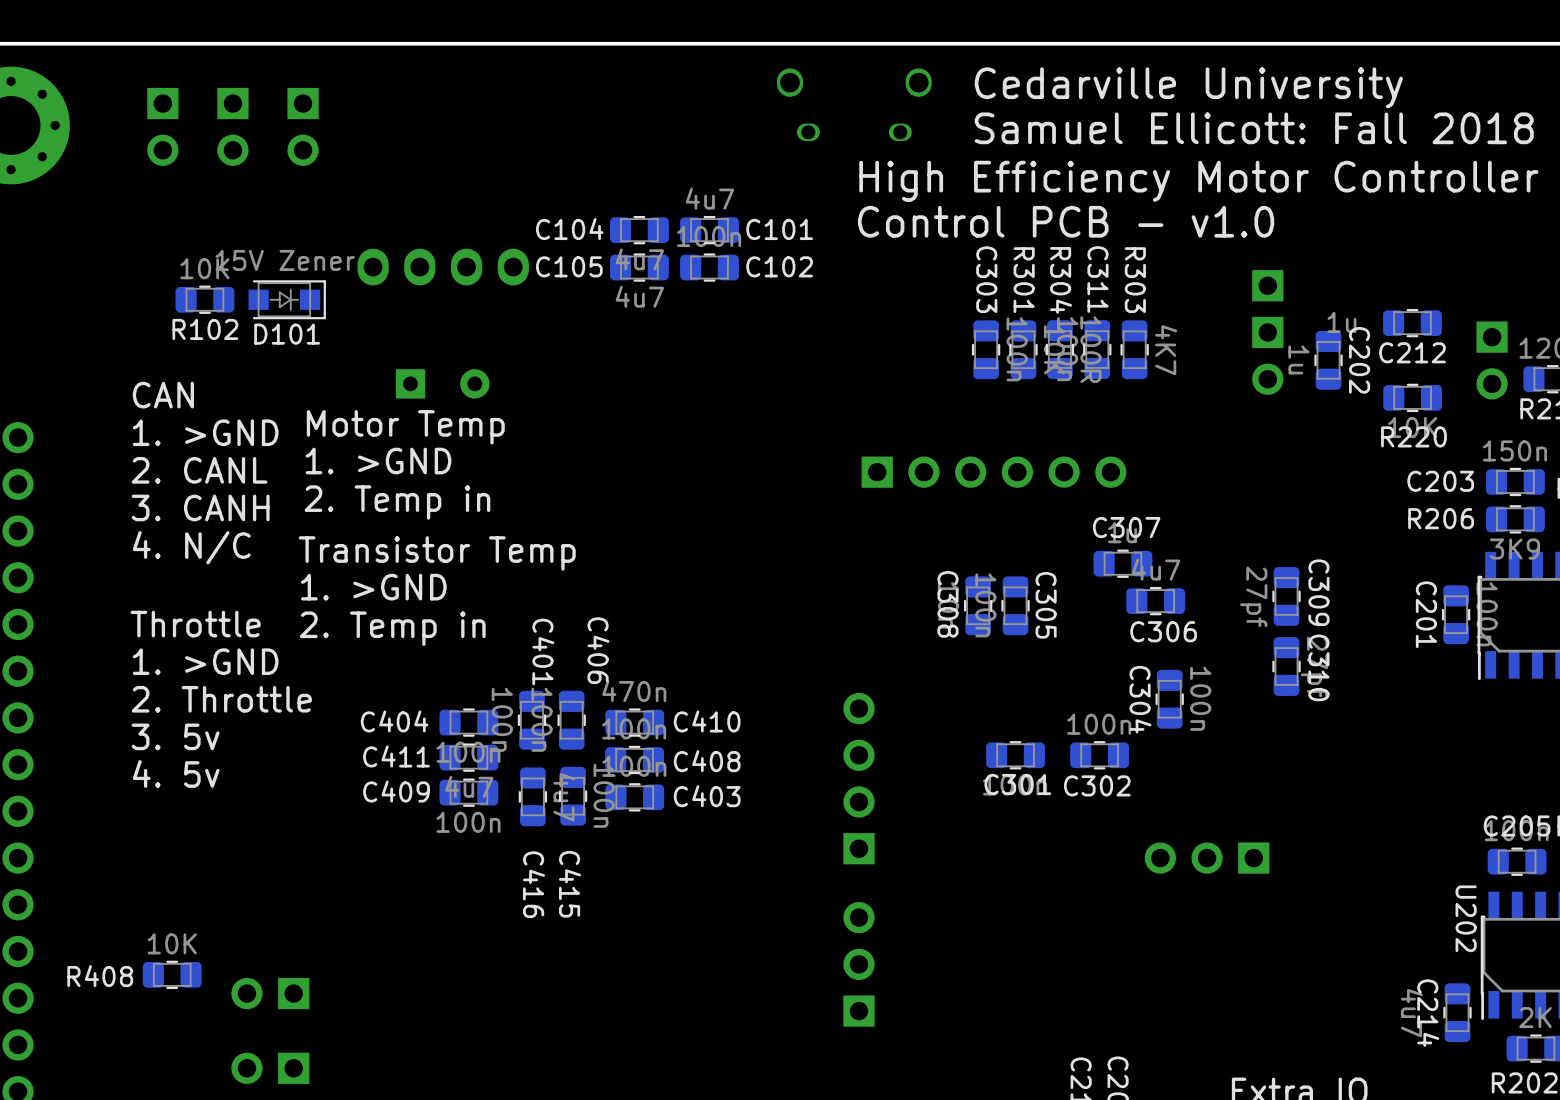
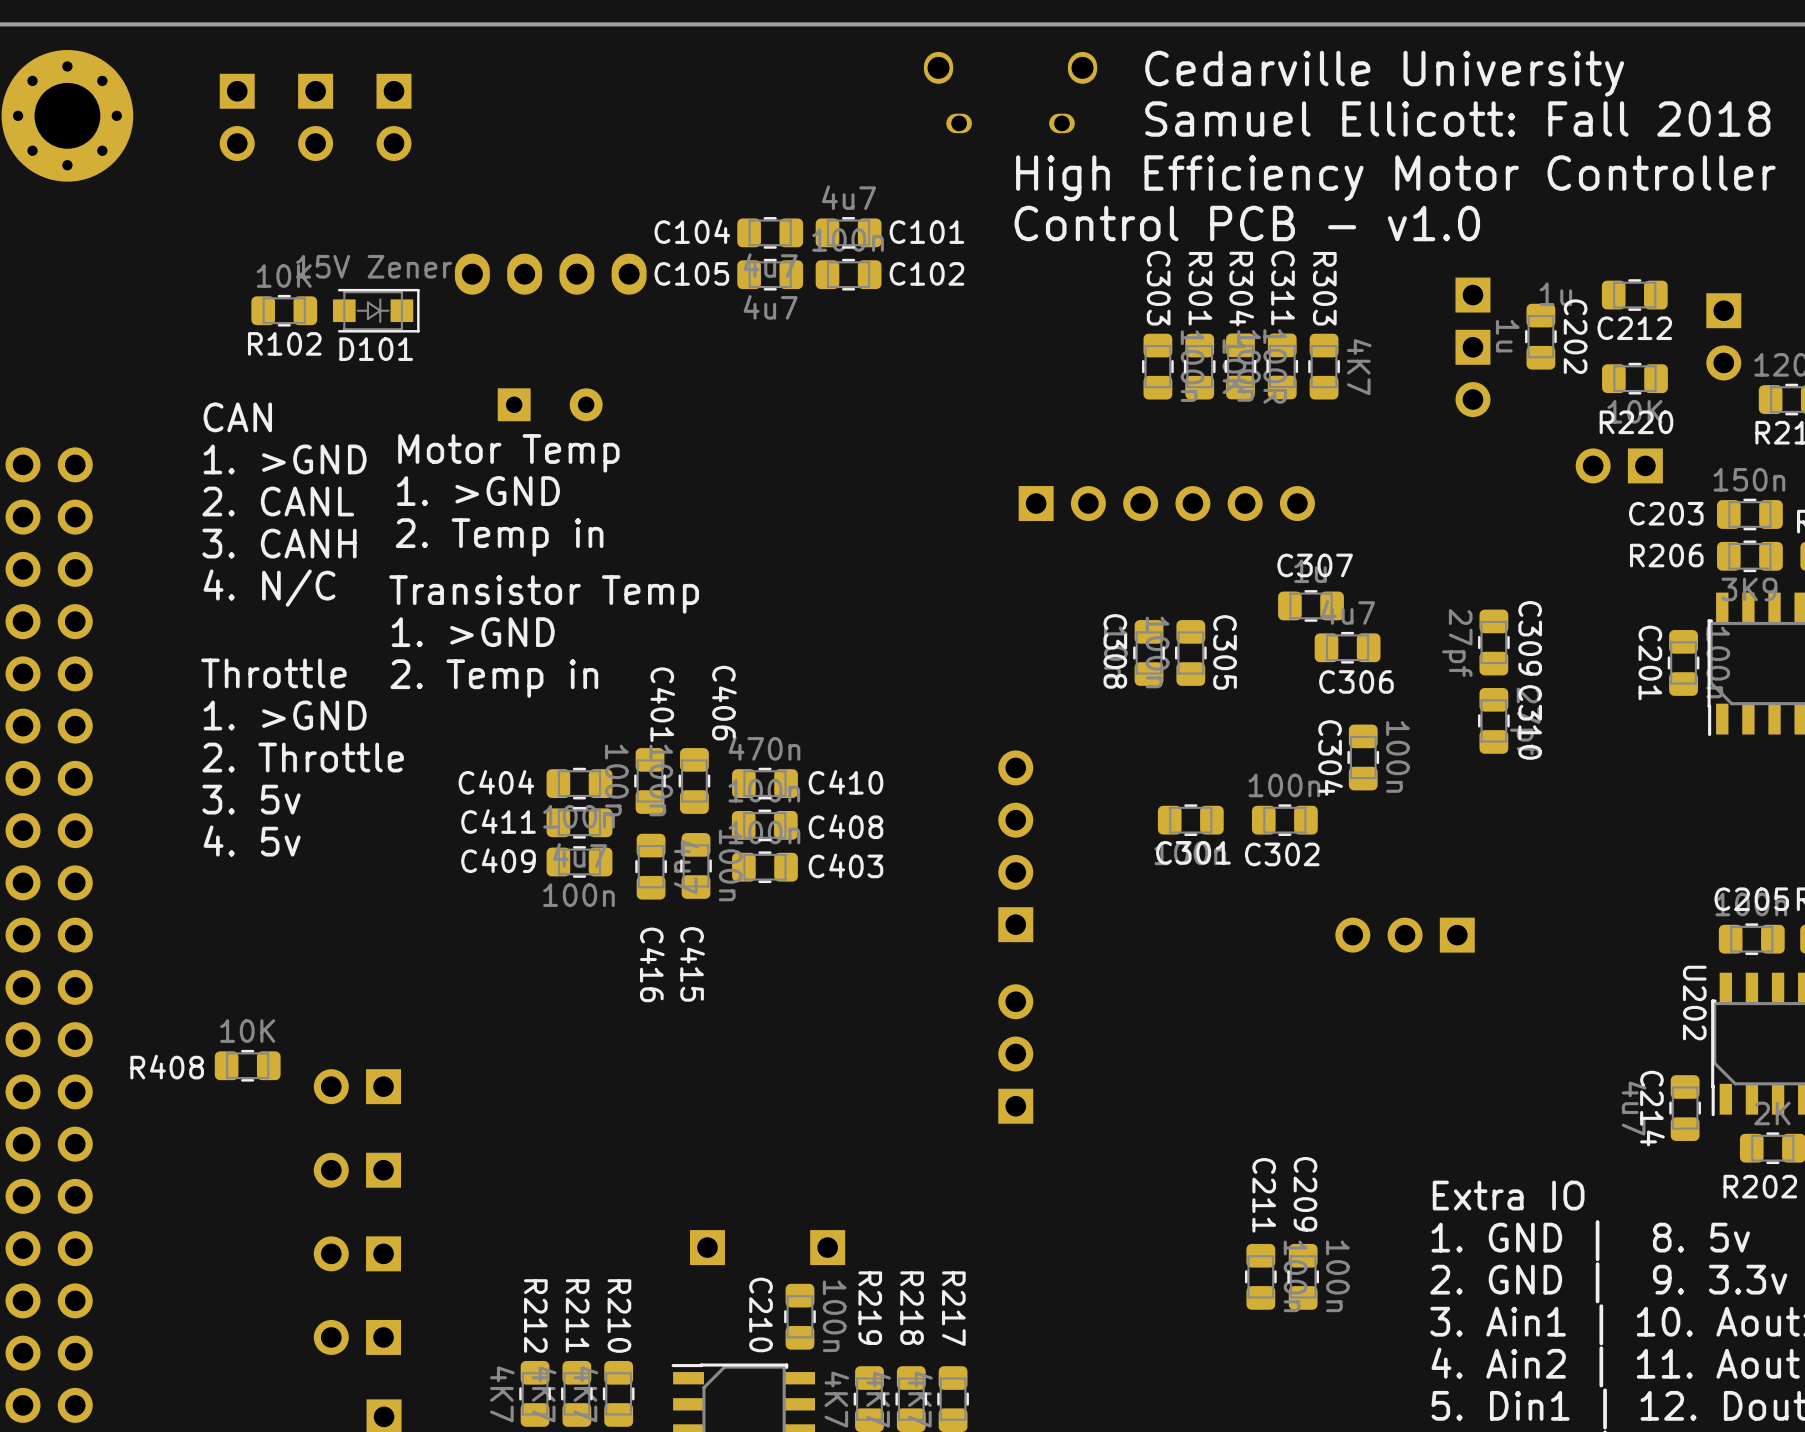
C212 position: (1412, 323) -> (1634, 295)
C202 position: (1328, 360) -> (1540, 336)
part position: (1492, 360) -> (1723, 336)
R220 position: (1412, 397) -> (1634, 378)
part: none -> (1619, 465)

